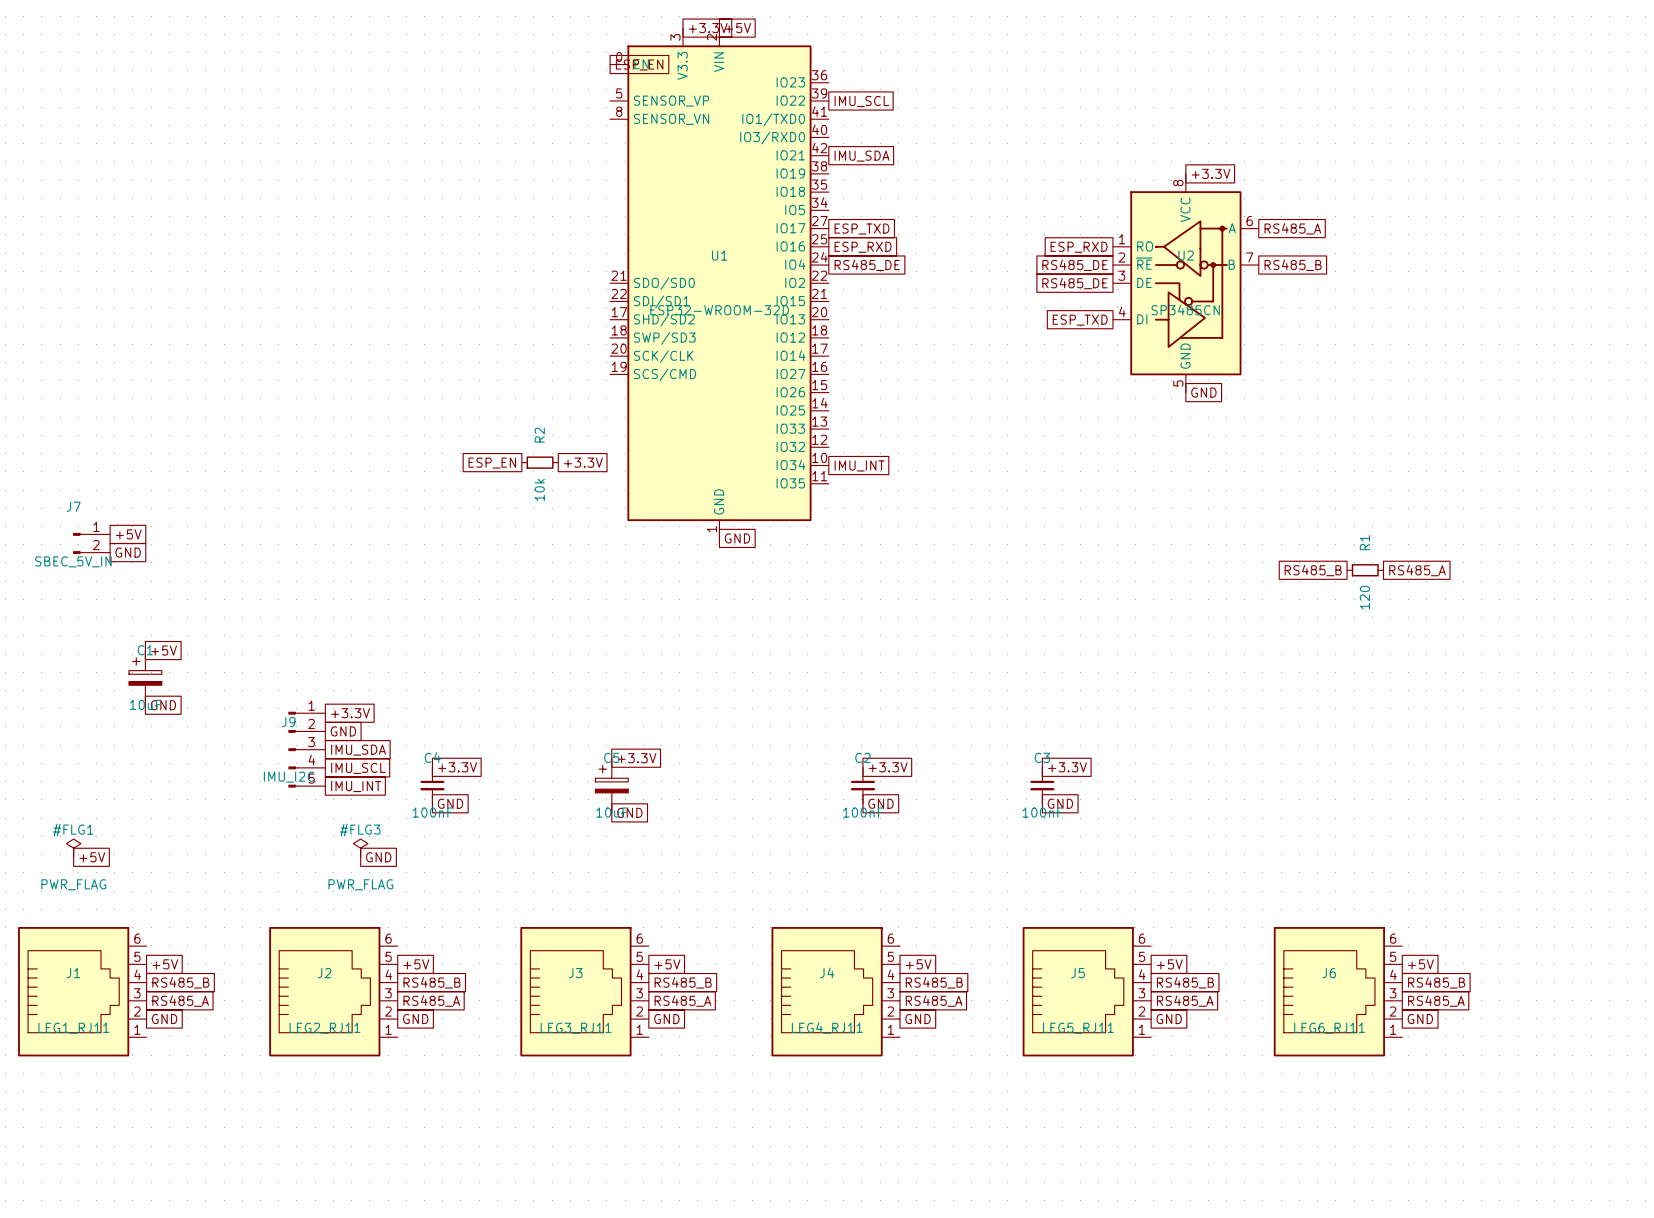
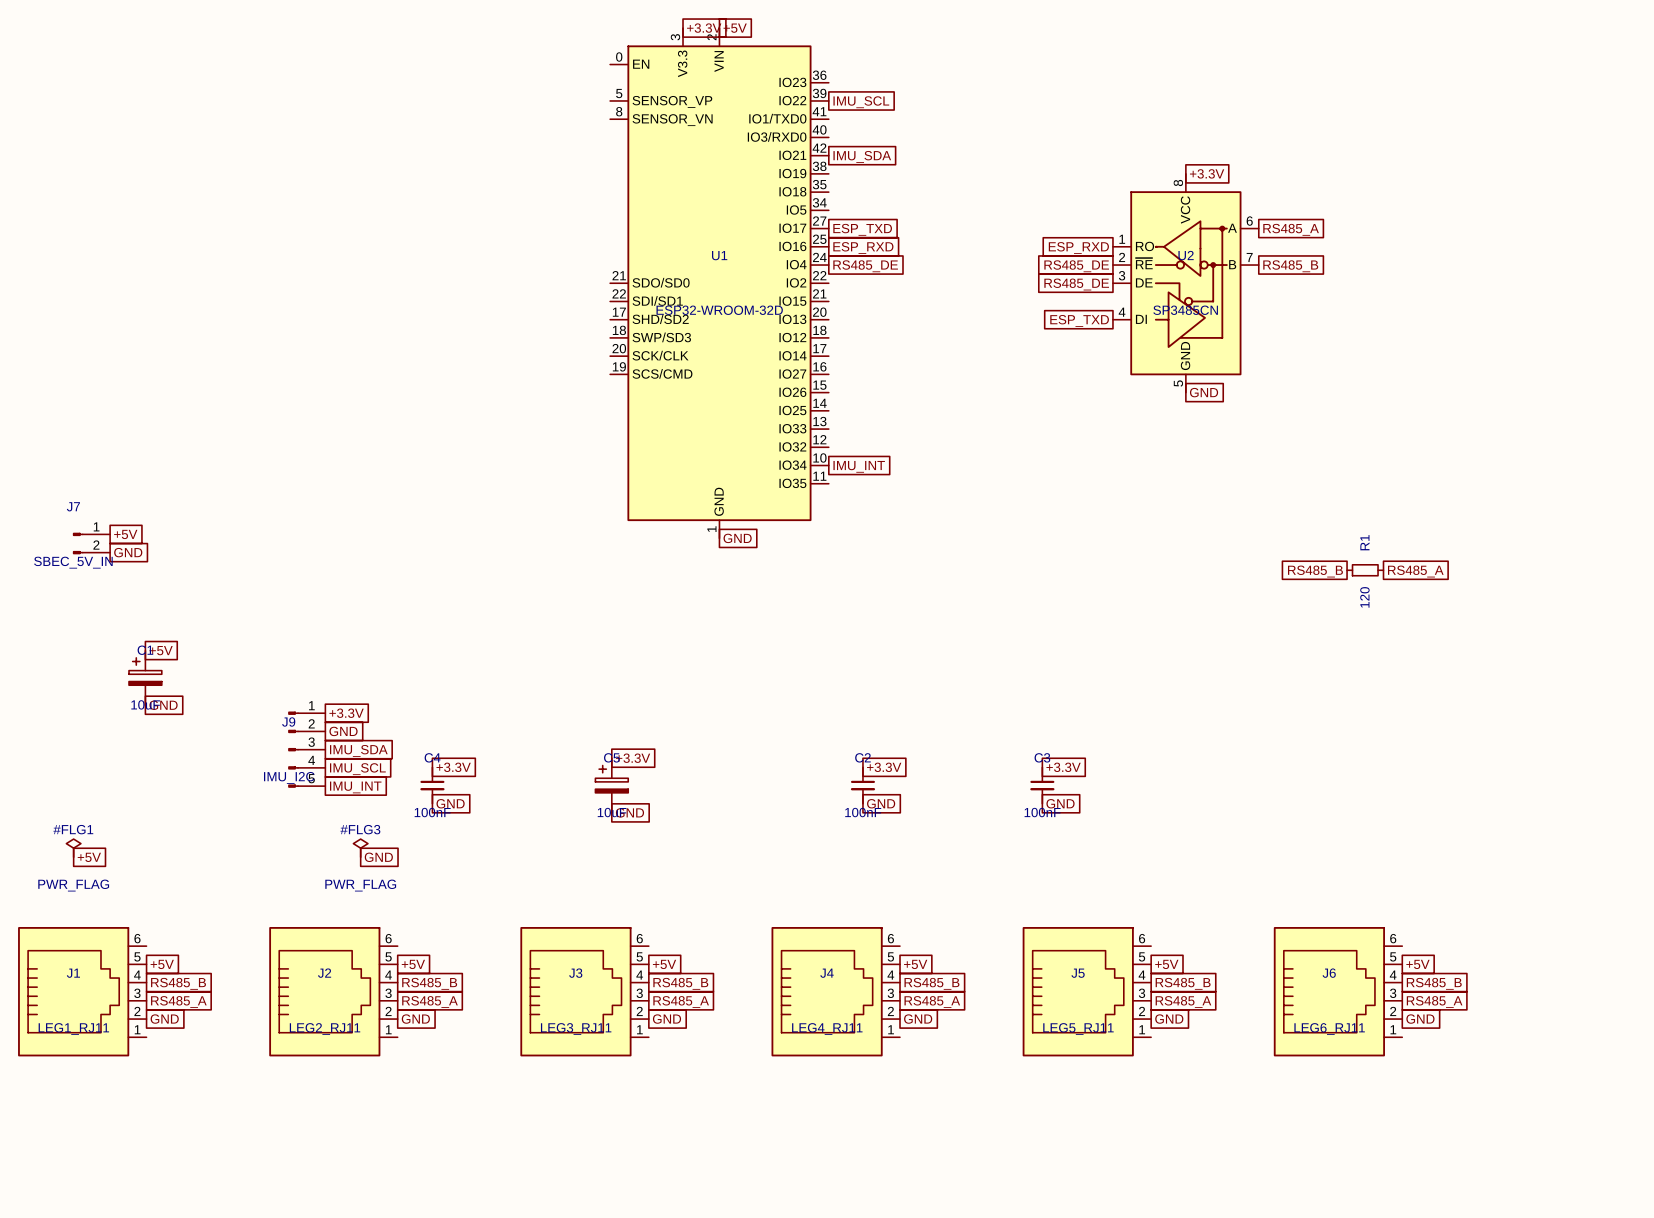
global label: ESP_EN (639, 64) -> none
R2: 10k (540, 462) -> none
global label: +3.3V (583, 462) -> none
global label: ESP_EN (492, 463) -> none

